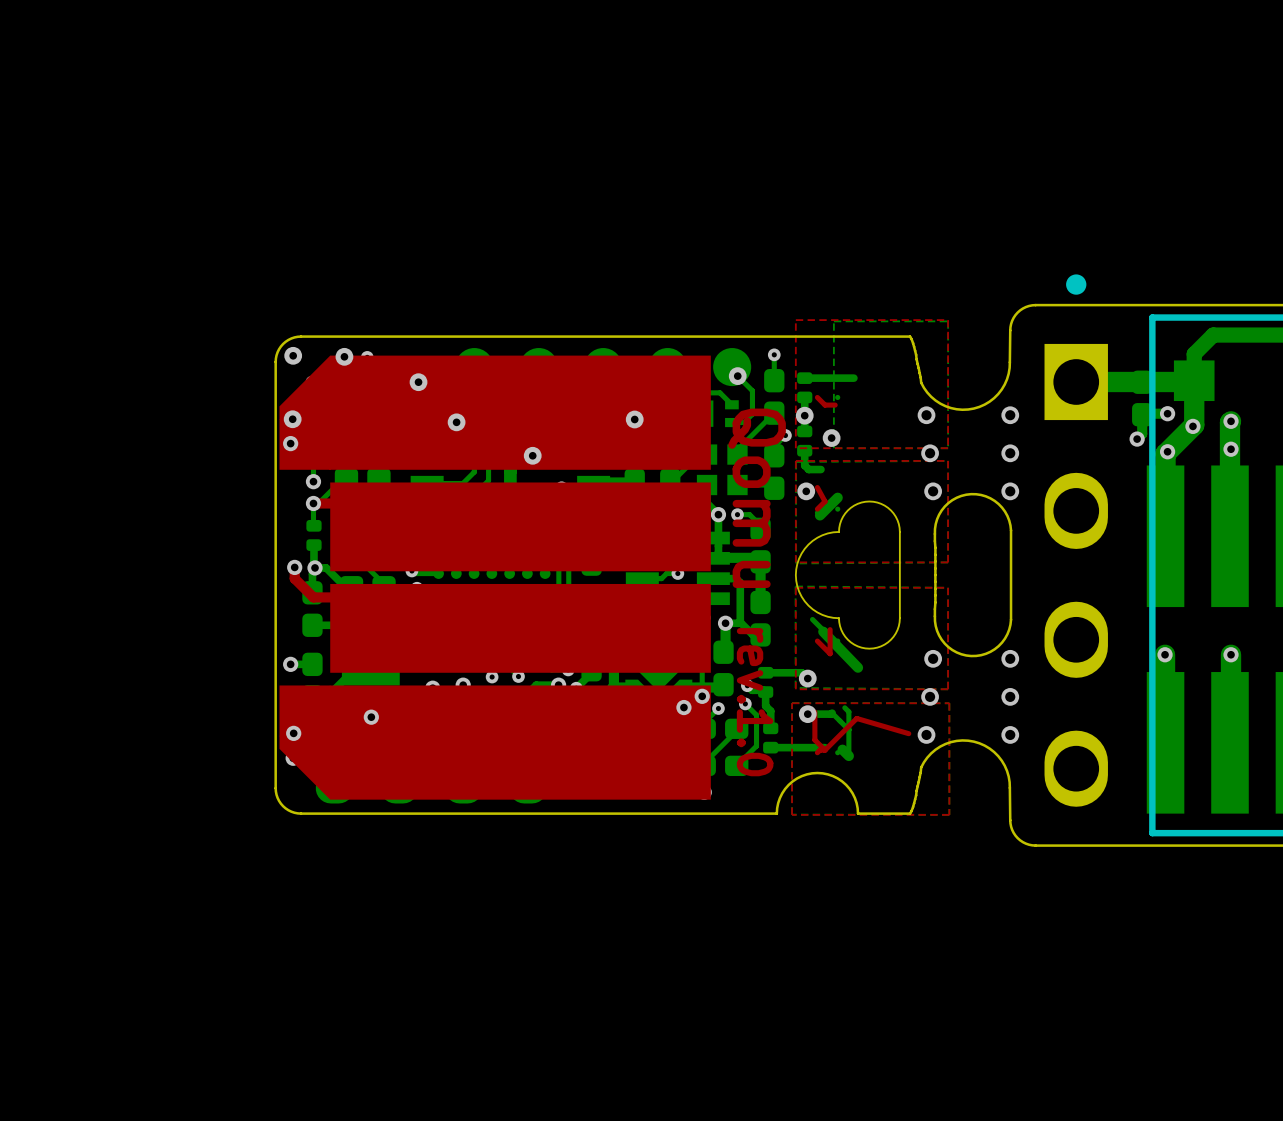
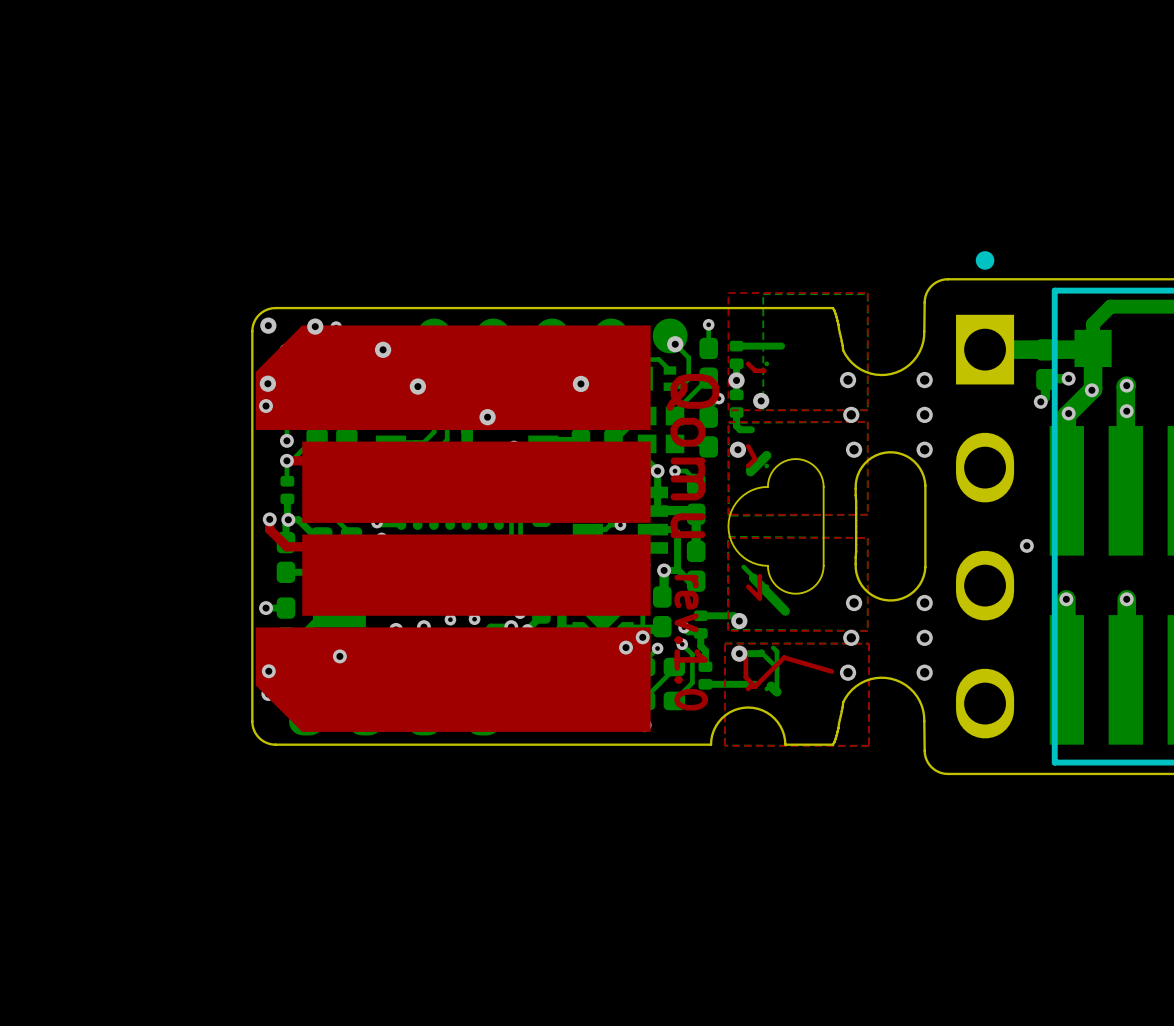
via: none -> (1026, 545)

